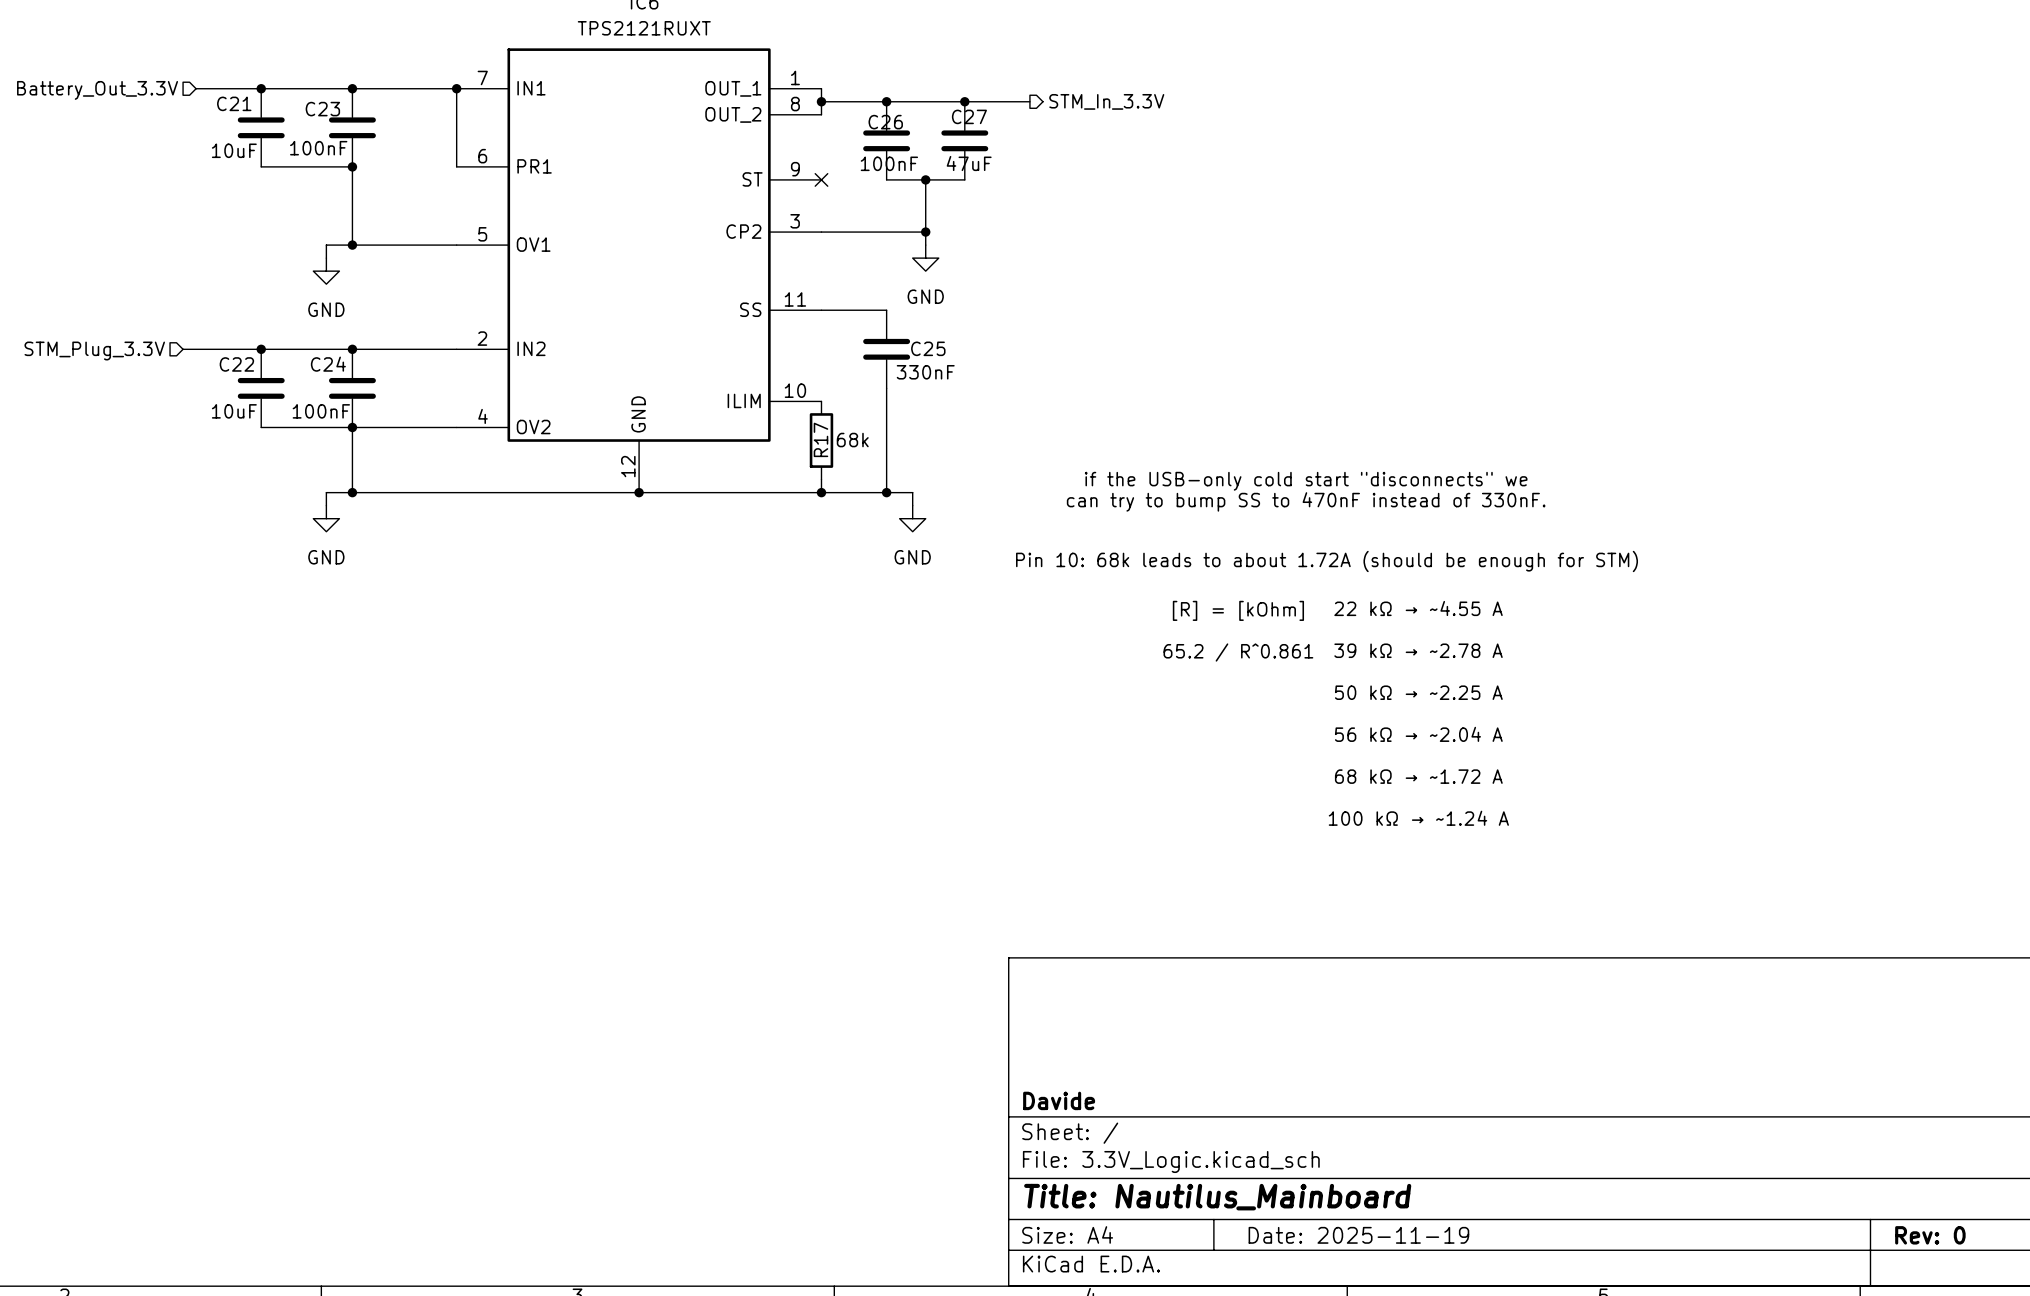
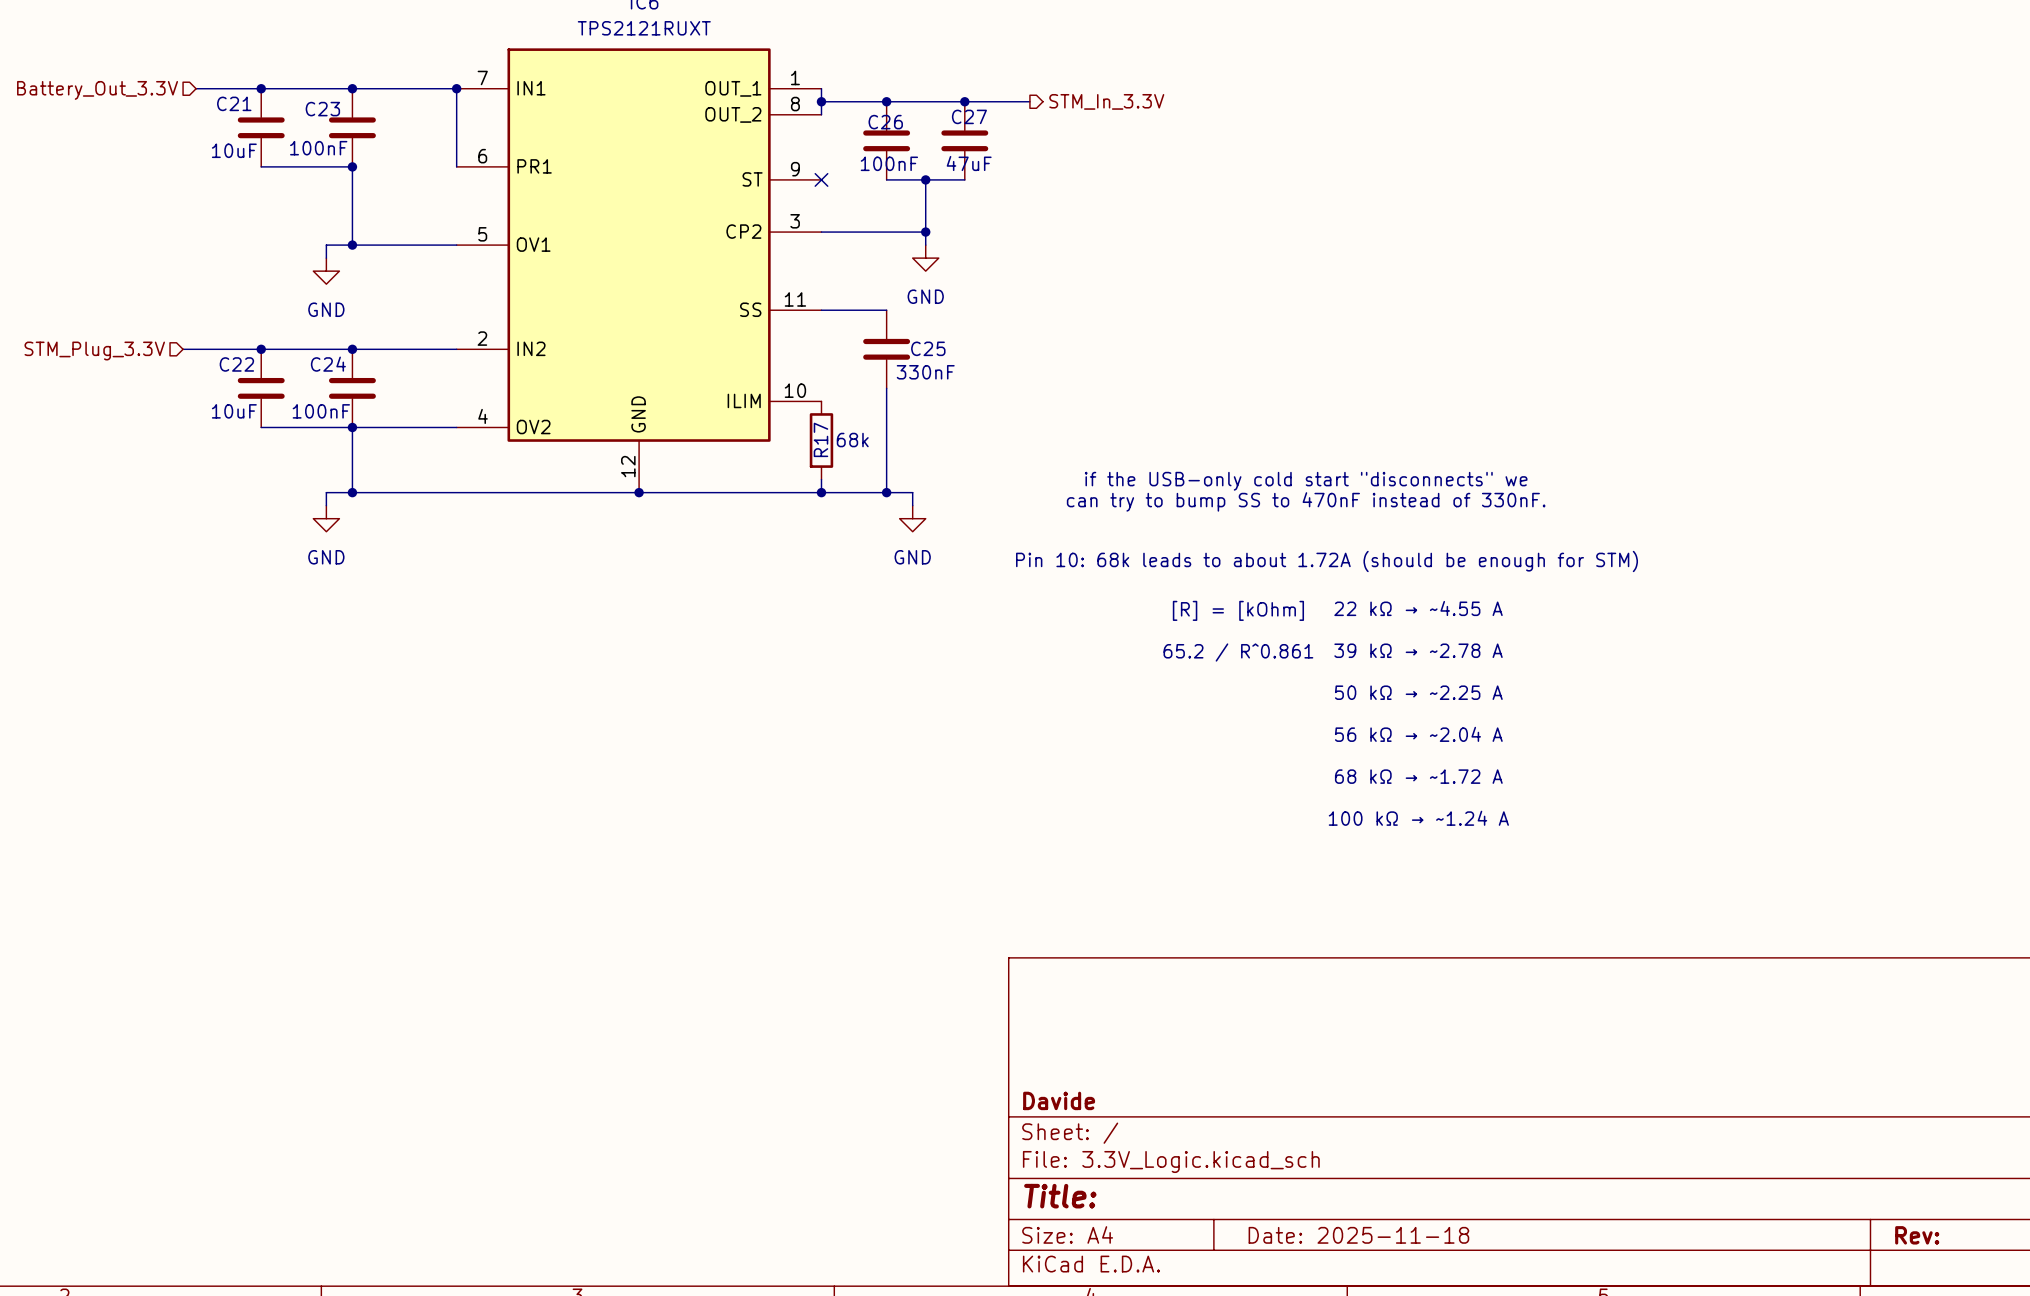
title block: Title: Nautilus_Mainboard (1217, 1197) -> Title: (1060, 1196)
title block: Date: 2025-11-19 (1358, 1235) -> Date: 2025-11-18 (1358, 1235)
title block: Rev: 0 (1930, 1235) -> Rev: (1917, 1235)

